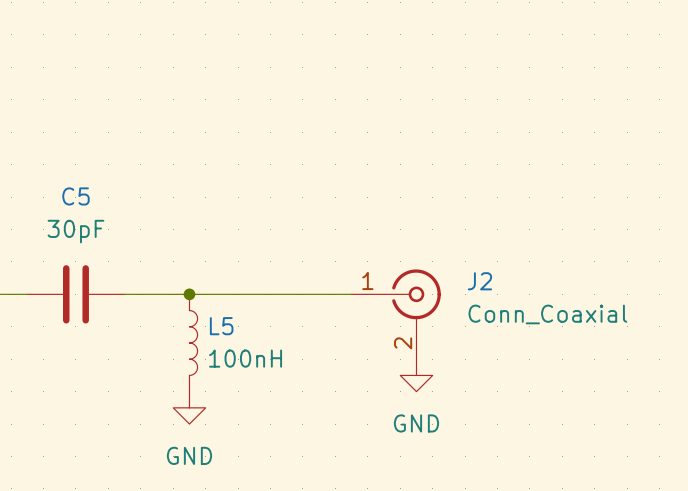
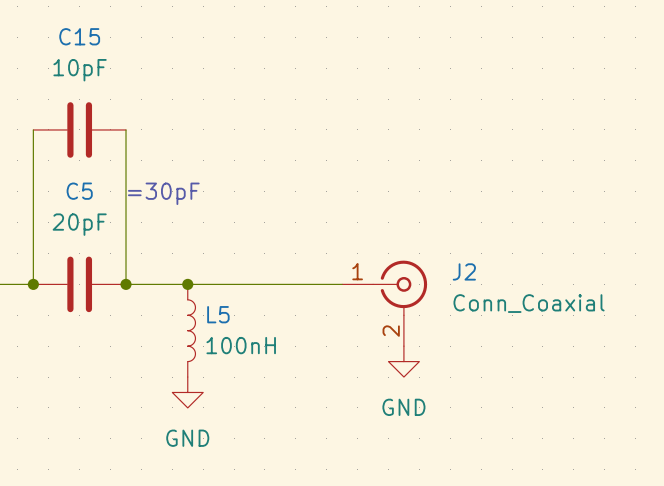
wire: none -> (33, 129) (33, 284)
C15: none -> 10pF (79, 129)
wire: none -> (126, 129) (126, 284)
text: none -> =30pF (163, 193)
C5 value: 30pF (75, 231) -> 20pF (79, 224)
junction: none -> (33, 284)
junction: none -> (126, 284)

